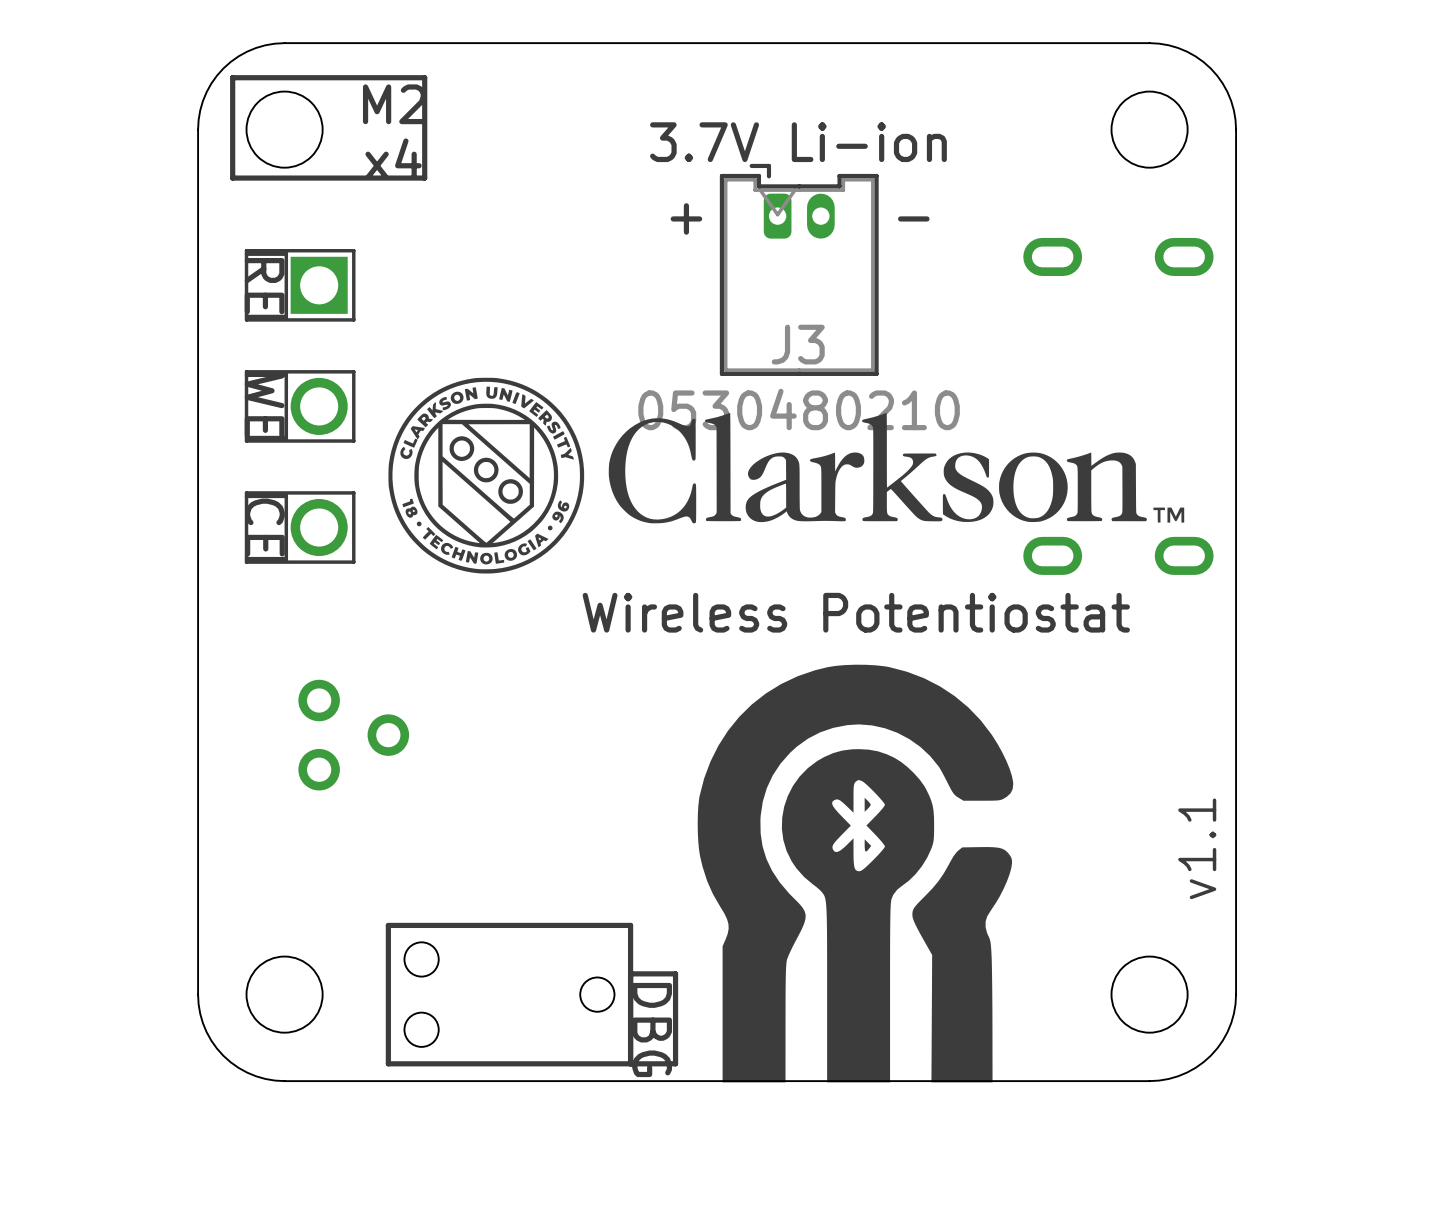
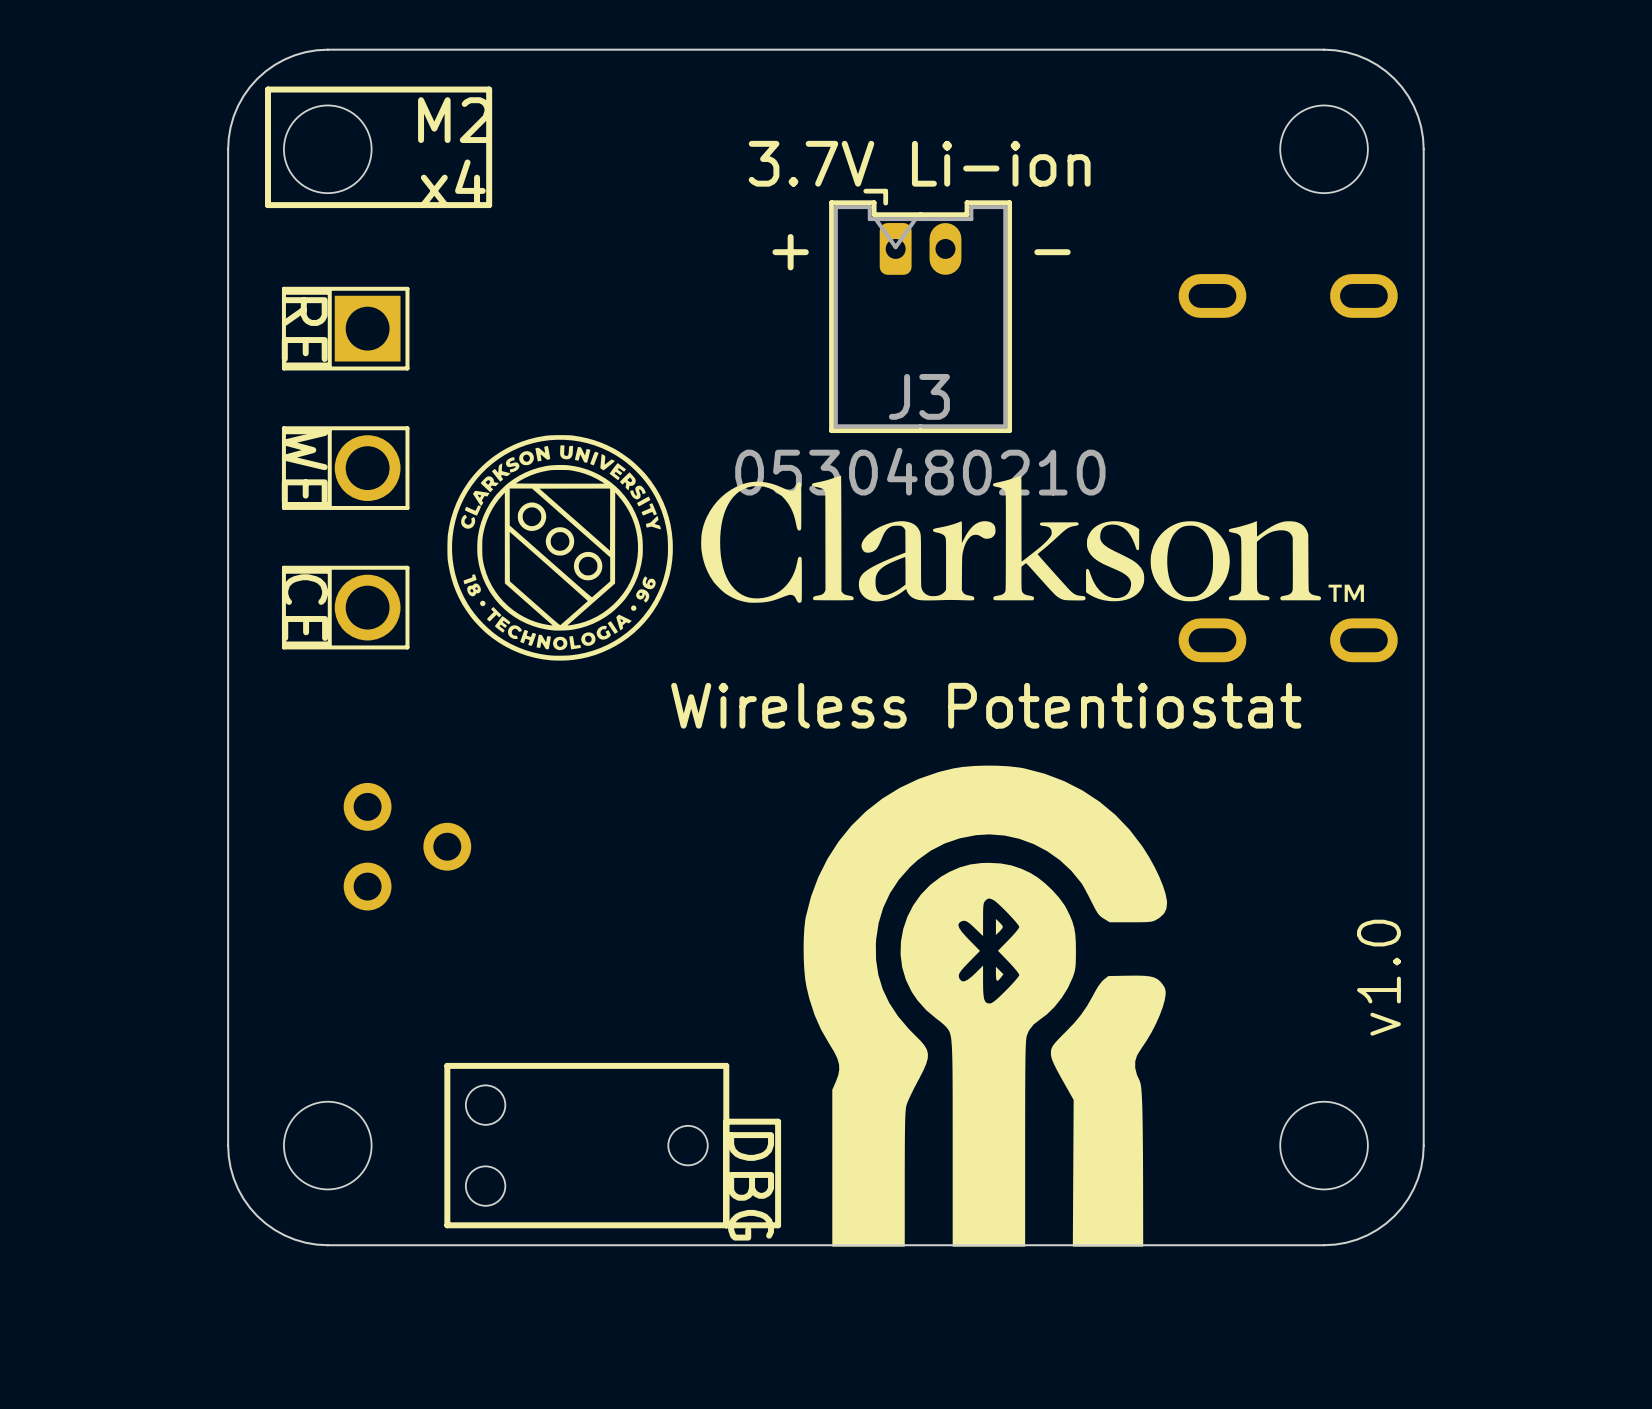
text: v1.1 (1197, 848) -> v1.0 (1378, 977)

